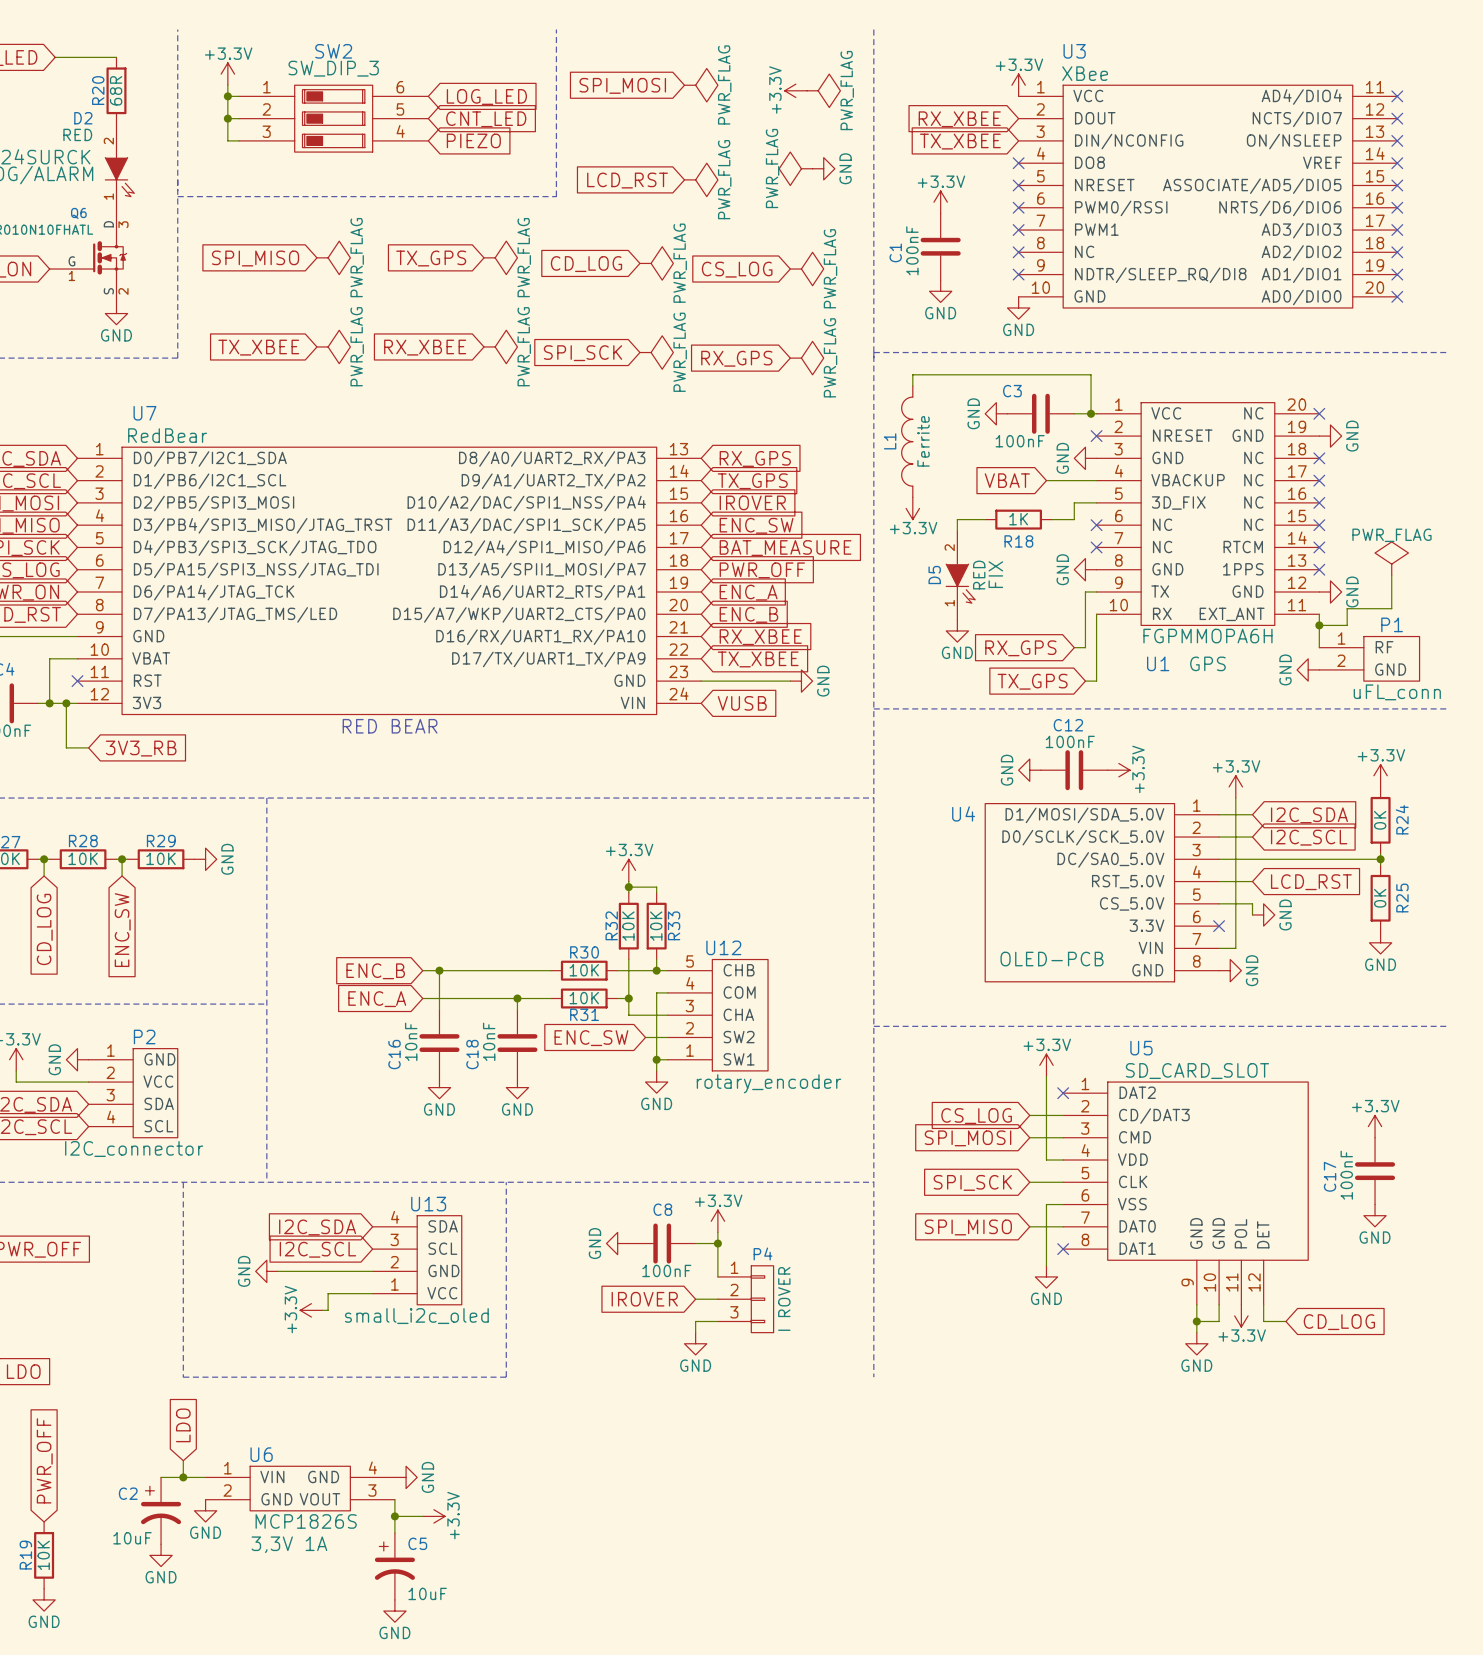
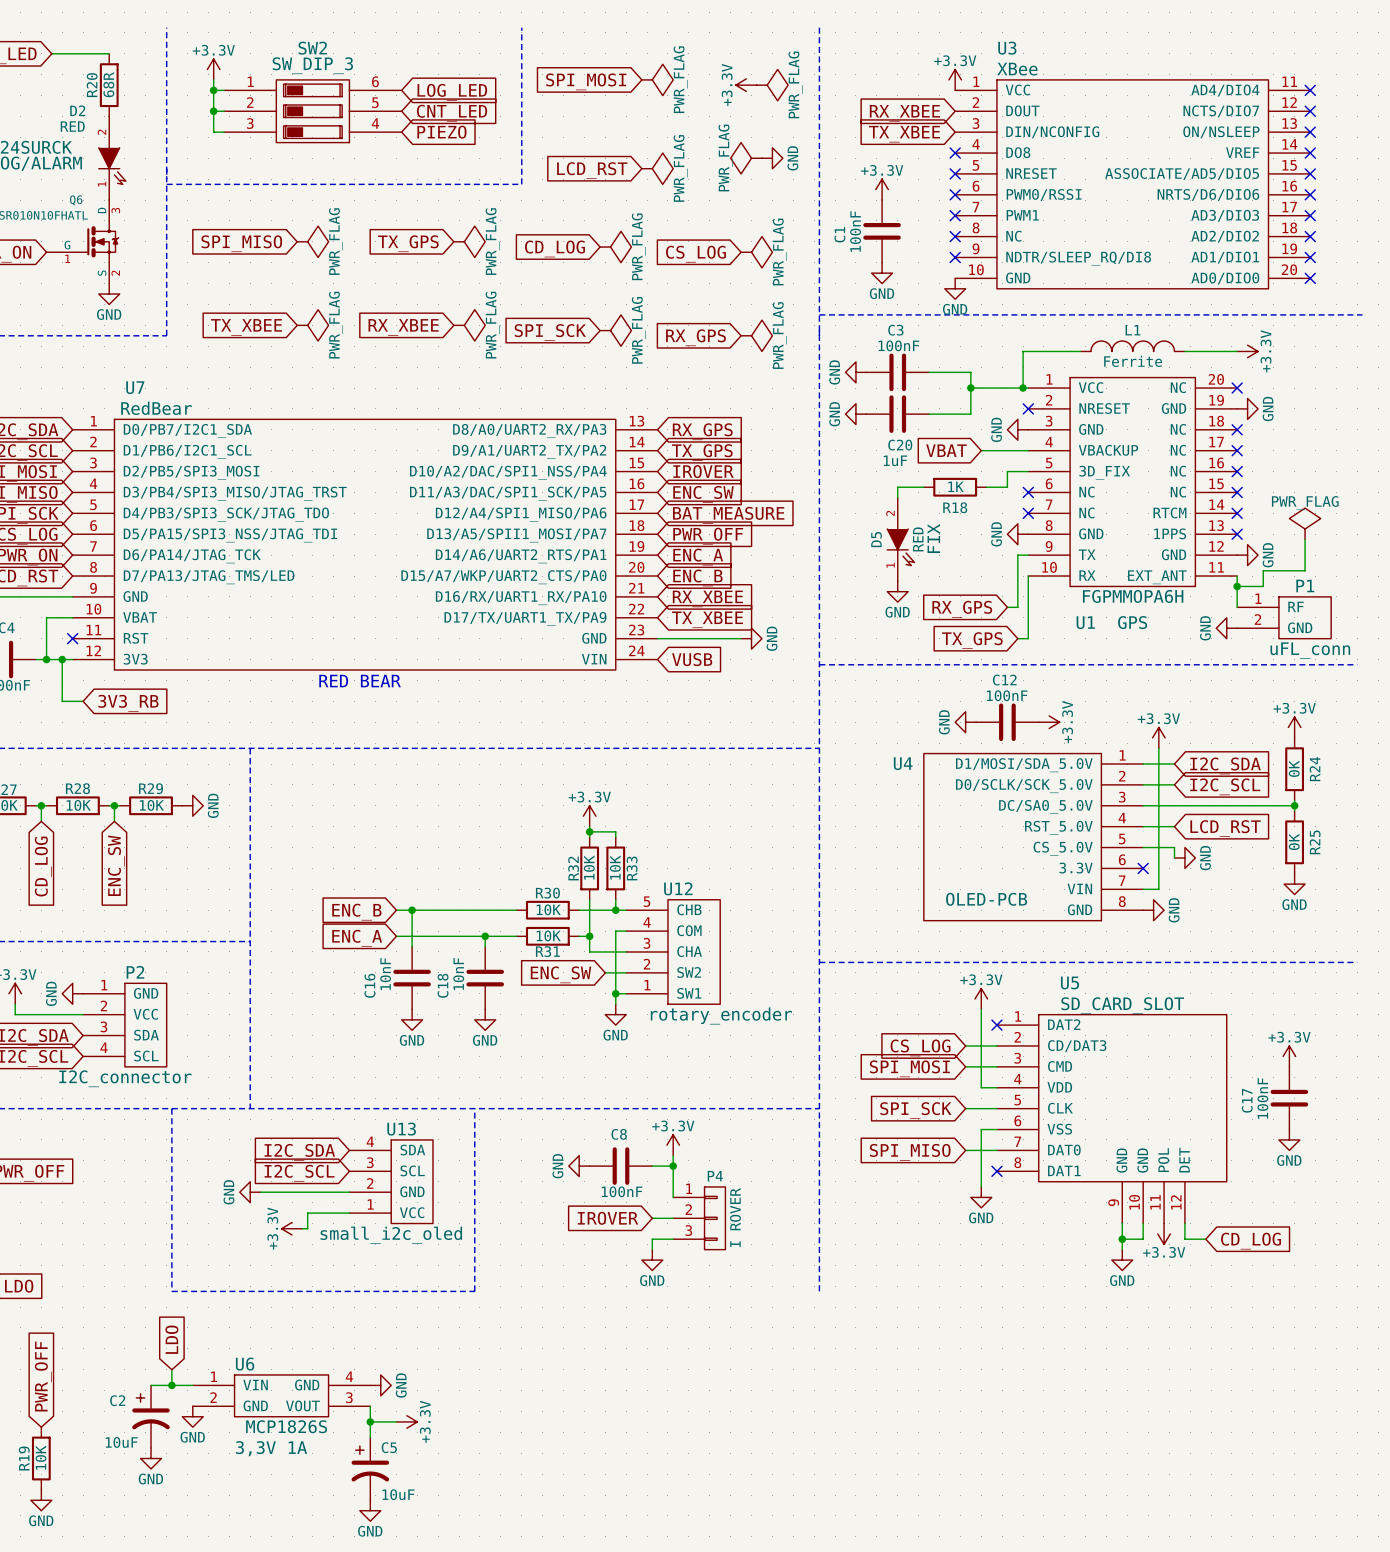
line: none -> (819, 314) (1362, 314)
line: (873, 352) (1447, 352) -> none
wire: (1091, 374) (912, 374) (912, 385) -> (1023, 351) (1080, 351)
wire: none -> (1184, 351) (1237, 351)
power symbol: none -> +3.3V (1247, 351)
C3 name position: C3 (1012, 391) -> C3 (895, 330)
power symbol: none -> GND (855, 372)
wire: none -> (929, 372) (970, 372) (970, 414) (929, 414)
power symbol: GND (996, 413) -> none
junction: none -> (970, 388)
C3 position: (1040, 413) -> (897, 372)
L1 rotation: 0° (907, 441) -> 90° clockwise (1132, 346)
L1 position: (907, 441) -> (1132, 346)
power symbol: none -> GND (855, 414)
C20: none -> 1uF (897, 414)
C3 value position: 100nF (1020, 441) -> 100nF (898, 345)
power symbol: +3.3V (912, 508) -> none

